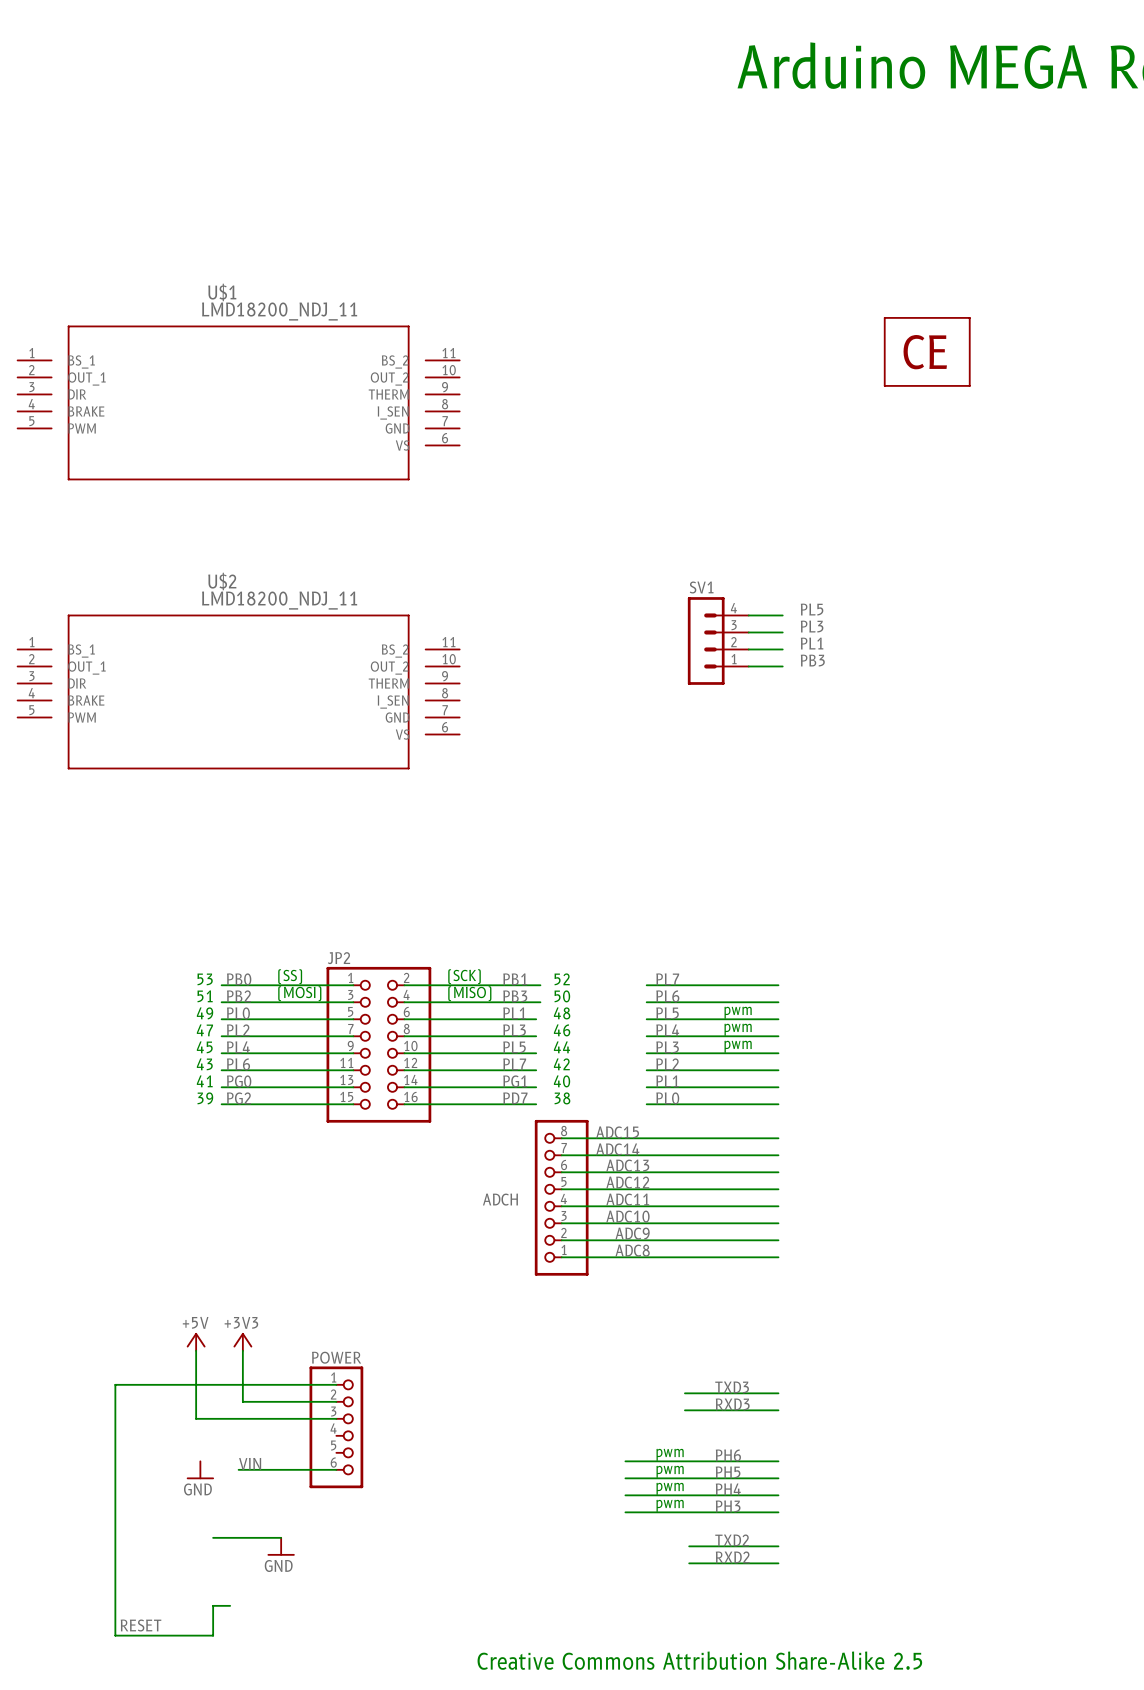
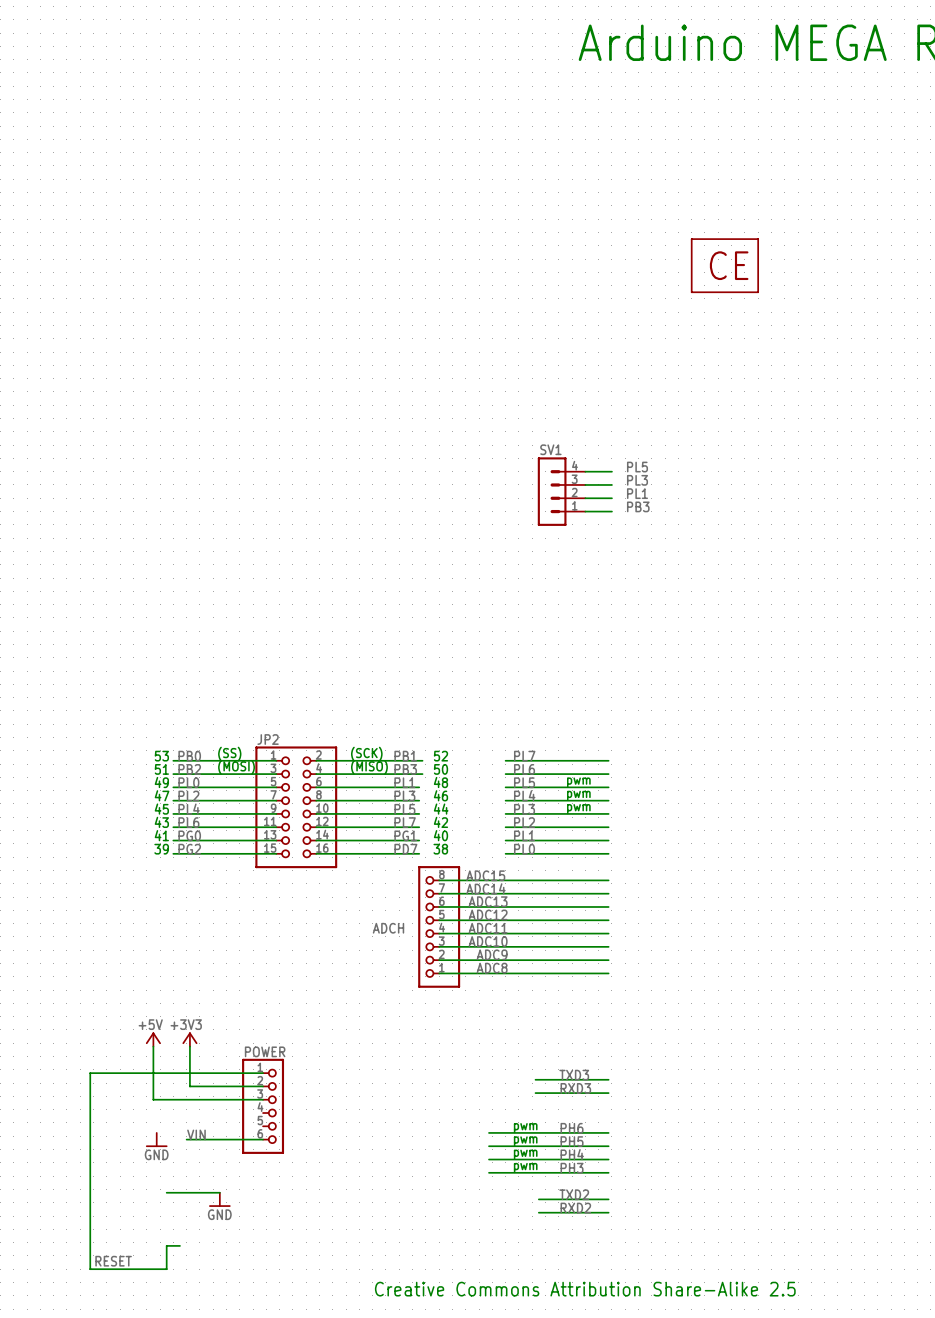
U$1: LMD18200_NDJ_11 (238, 402) -> none
U$2: LMD18200_NDJ_11 (238, 691) -> none

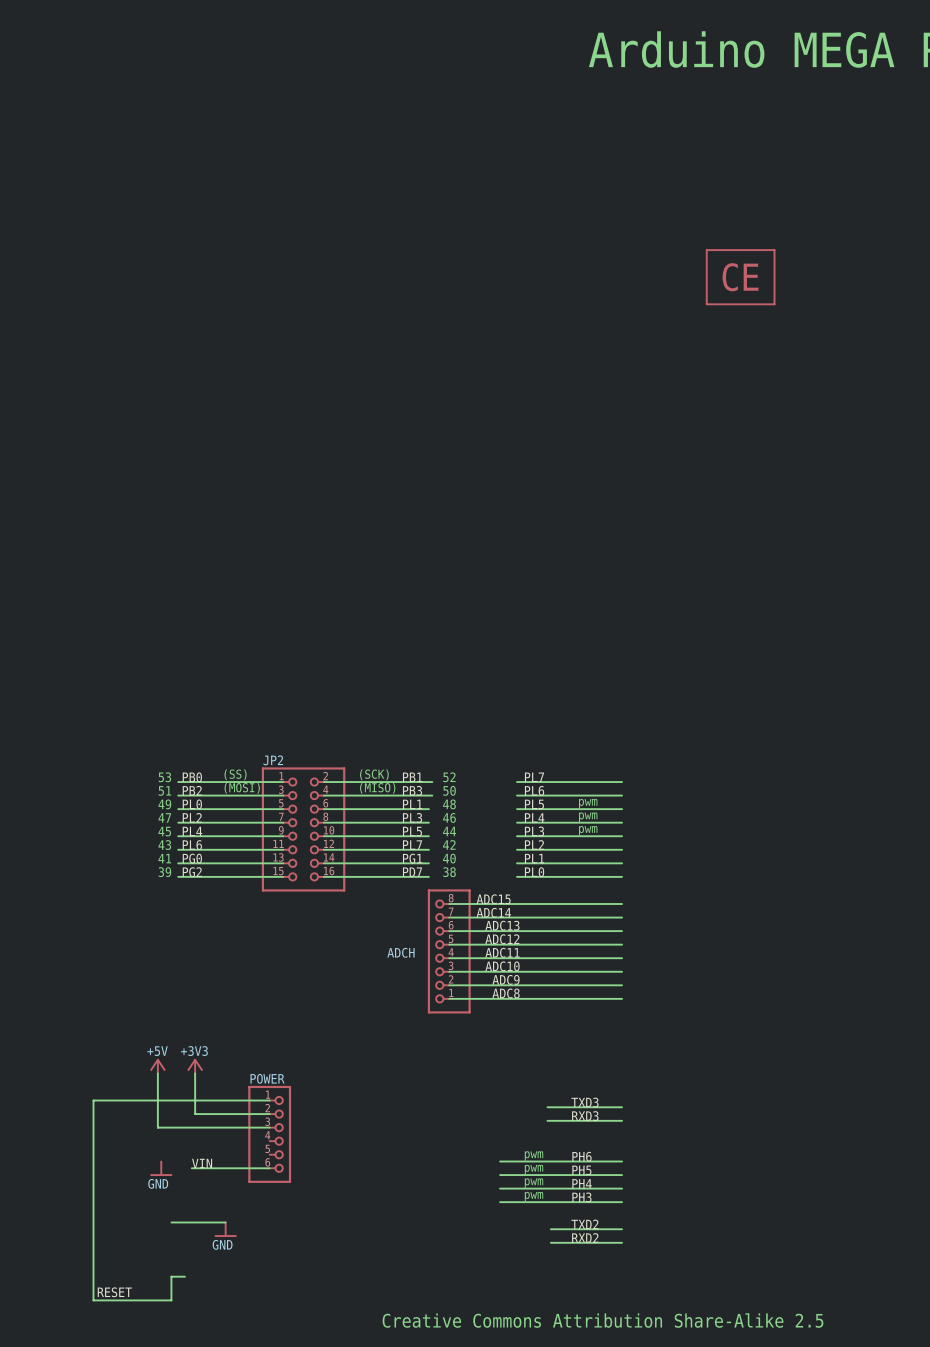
label: PL5 (637, 467) -> none
wire: (585, 471) (611, 471) -> none
label: PL3 (637, 480) -> none
wire: (585, 484) (611, 484) -> none
SV1: (561, 491) -> none
label: PL1 (637, 493) -> none
wire: (585, 498) (611, 498) -> none
label: PB3 (638, 506) -> none
wire: (585, 511) (611, 511) -> none

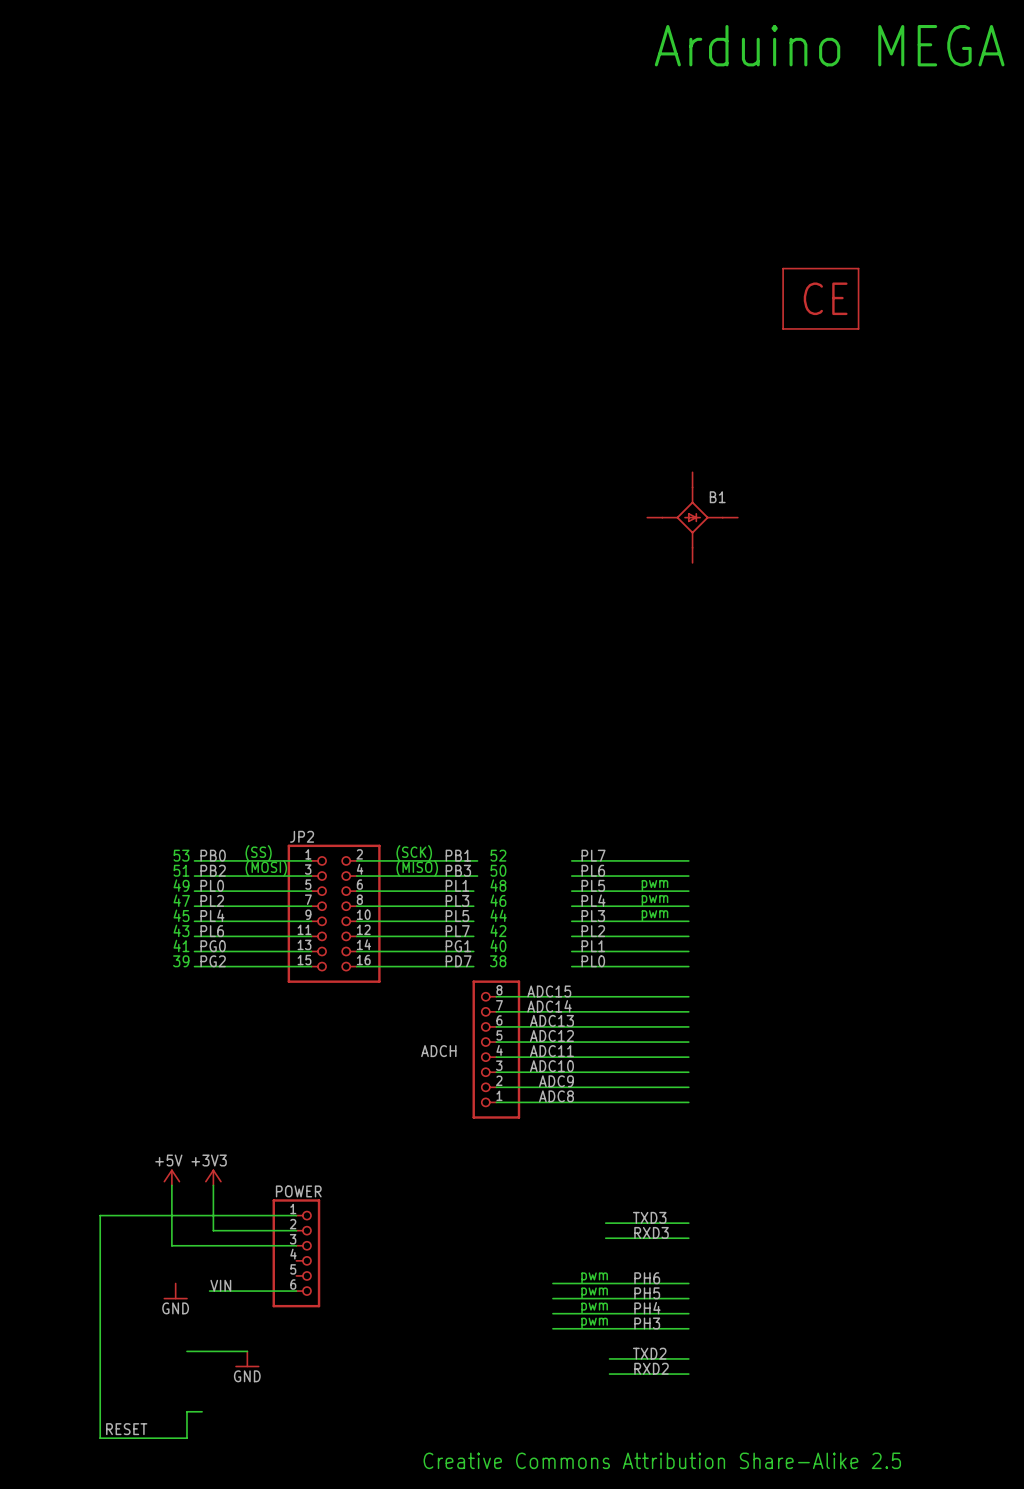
B1: none -> (692, 517)

